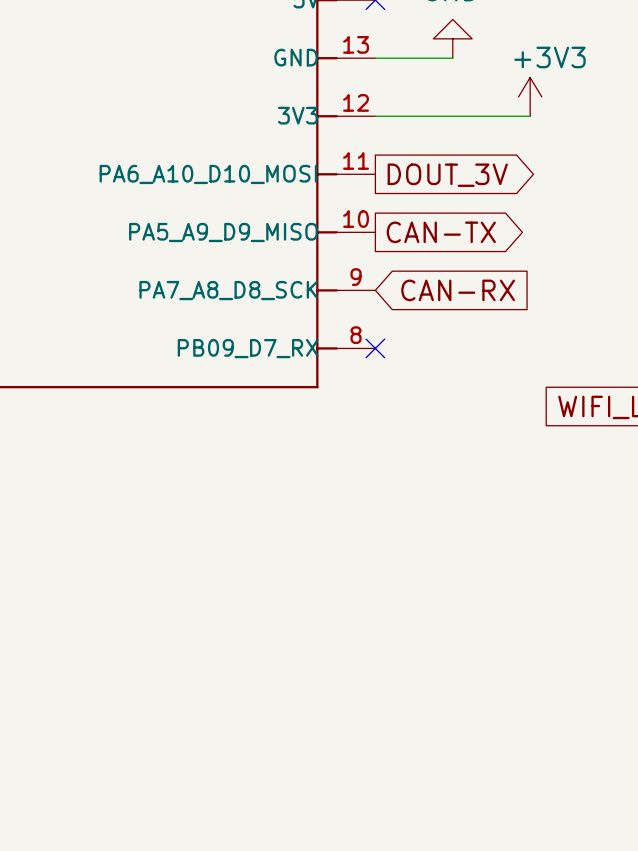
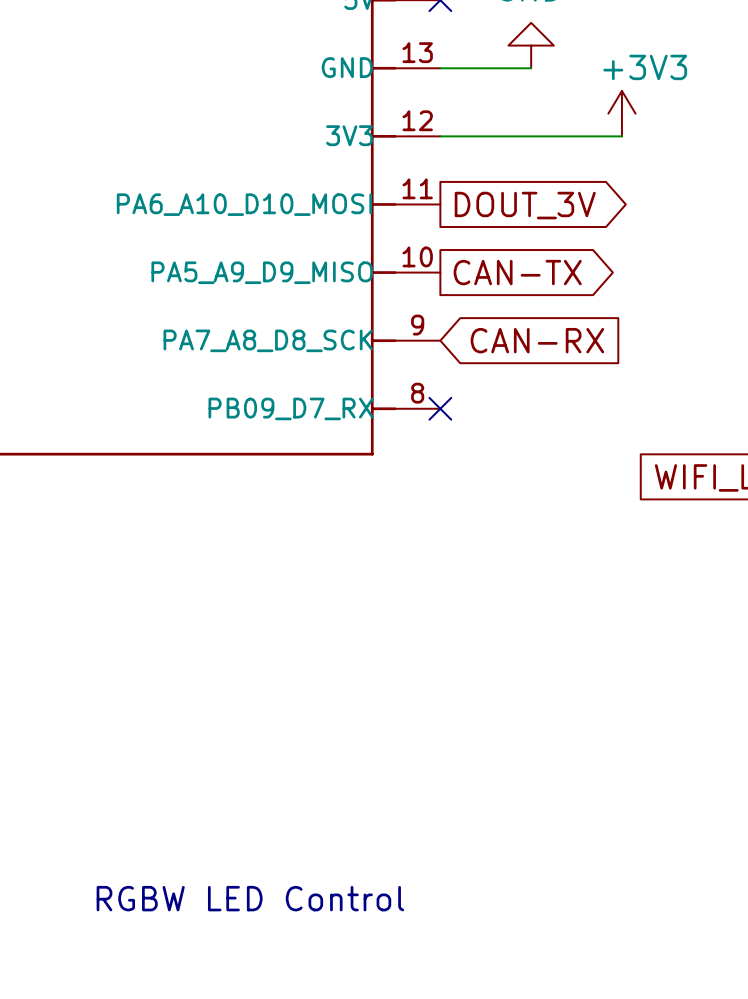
text: none -> RGBW LED Control (250, 898)

